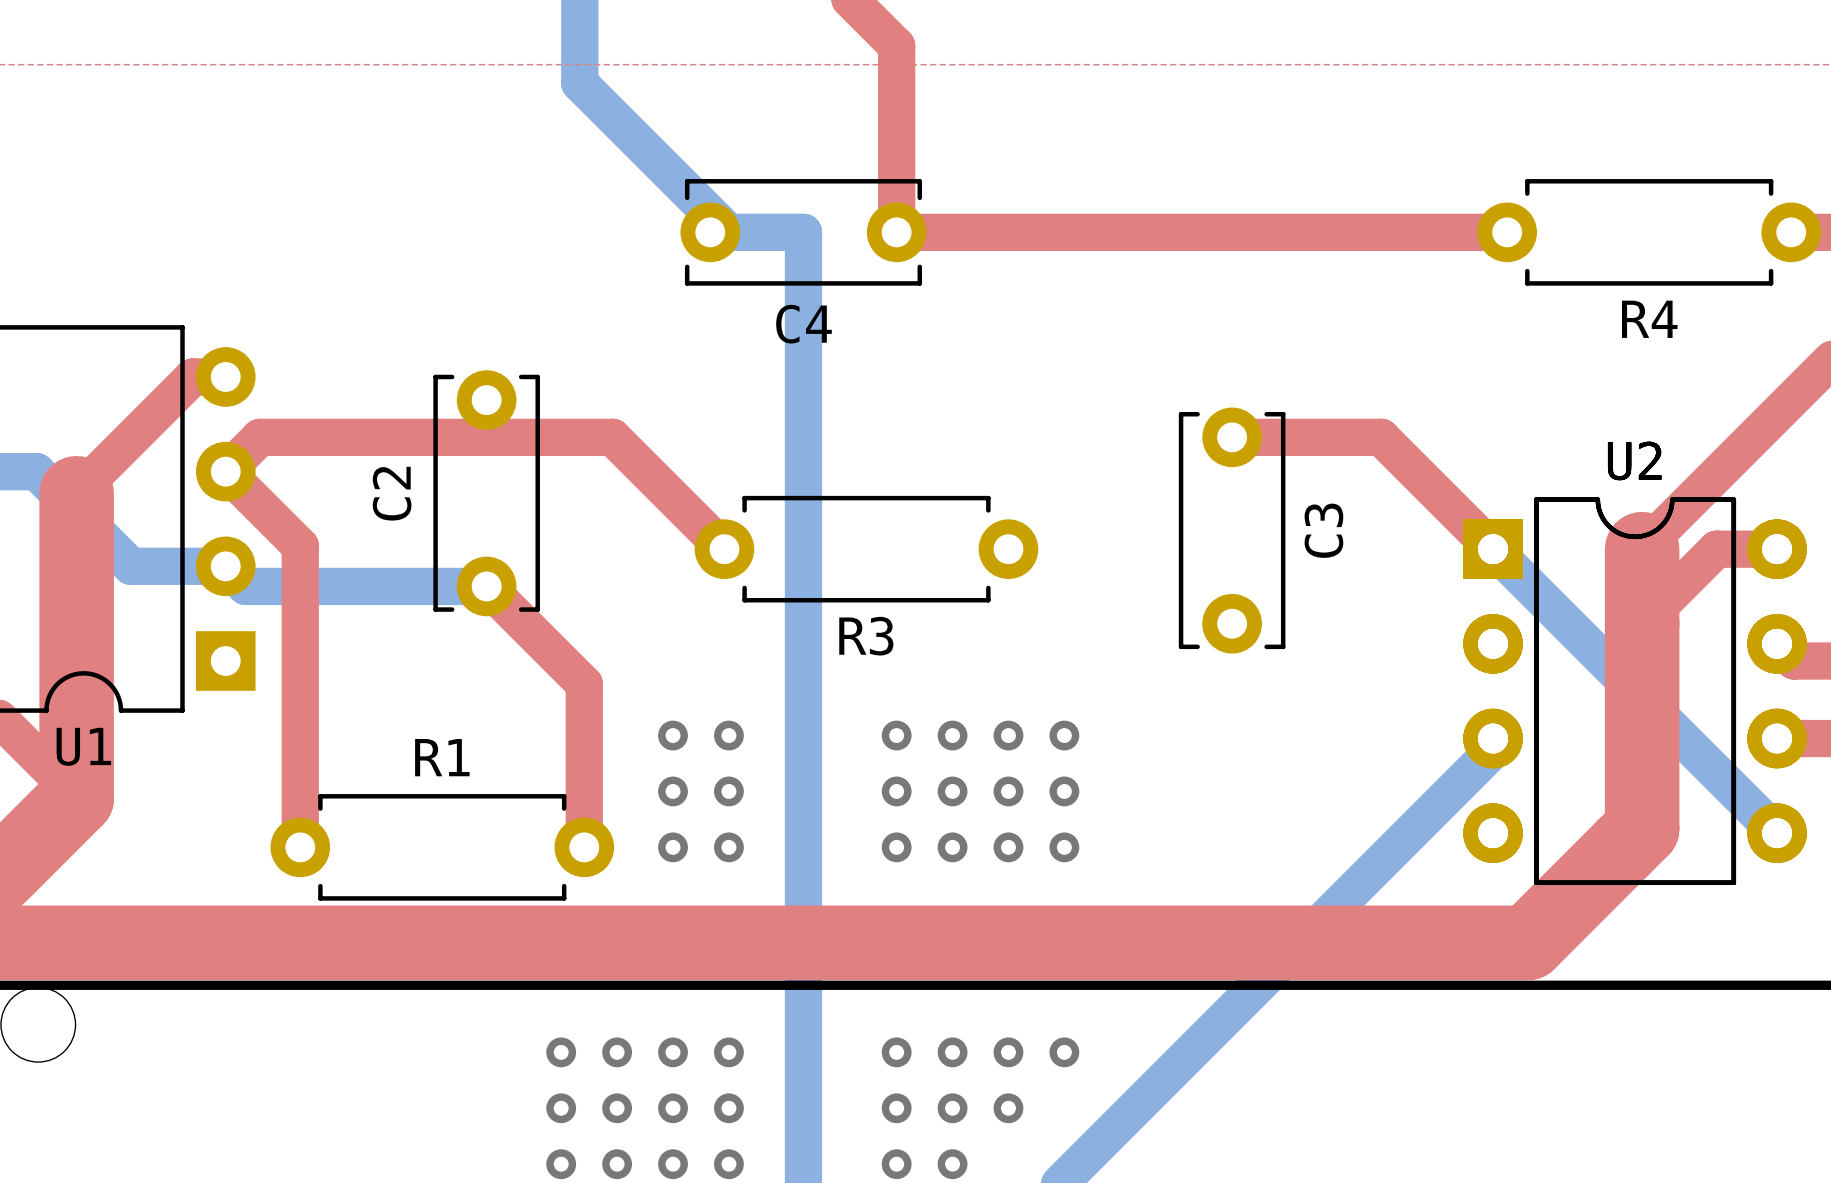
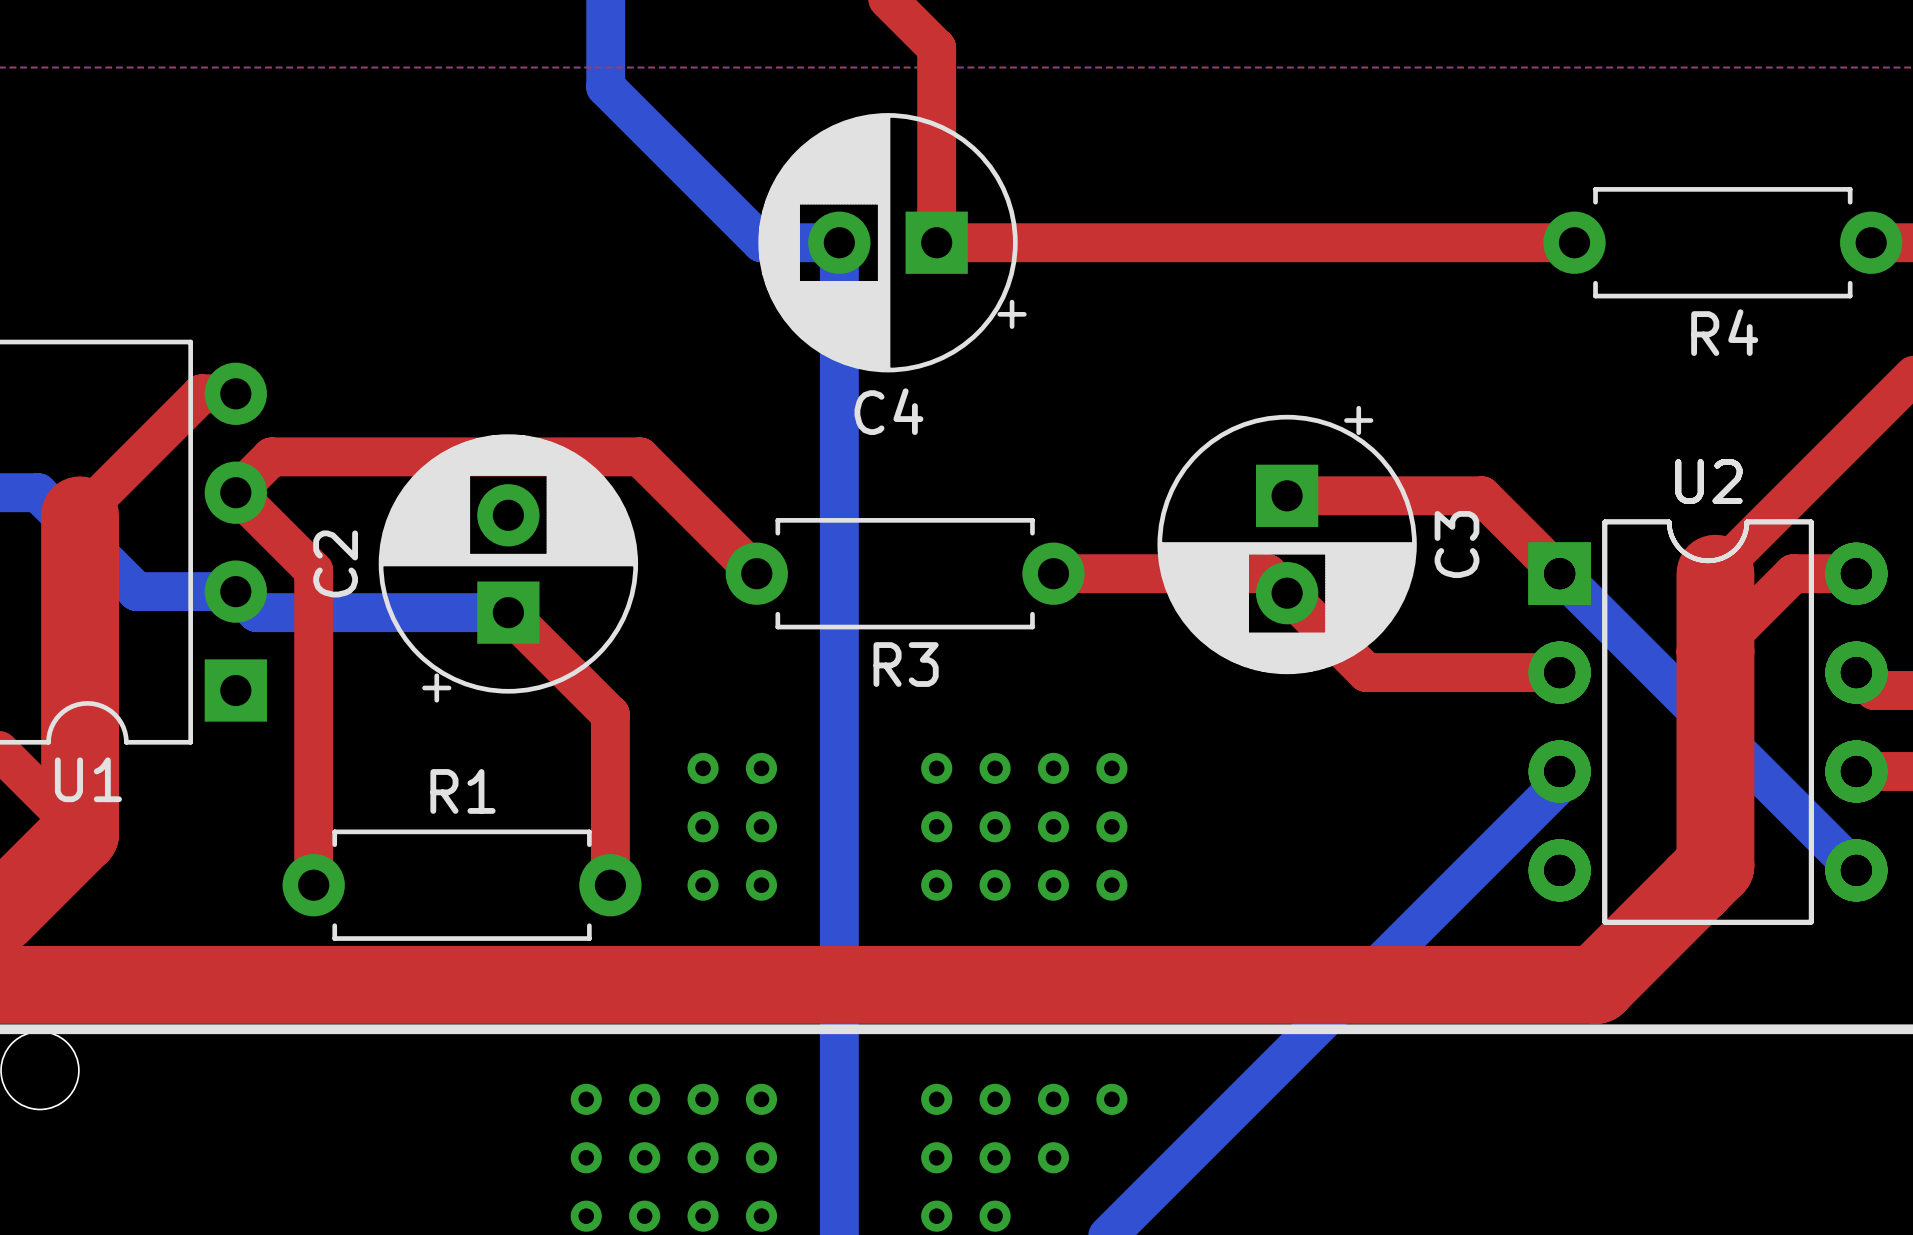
C4 footprint: [680, 179, 927, 286] -> [758, 113, 1027, 373]
C2 footprint: [433, 370, 540, 617] -> [378, 434, 639, 703]
C3 footprint: [1178, 407, 1286, 654] -> [1157, 405, 1417, 675]
top track: (1232, 437) (1381, 437) (1418, 474) -> (1287, 495) (1481, 495)
top track: none -> (1053, 573) (1267, 573) (1366, 672) (1559, 672)

